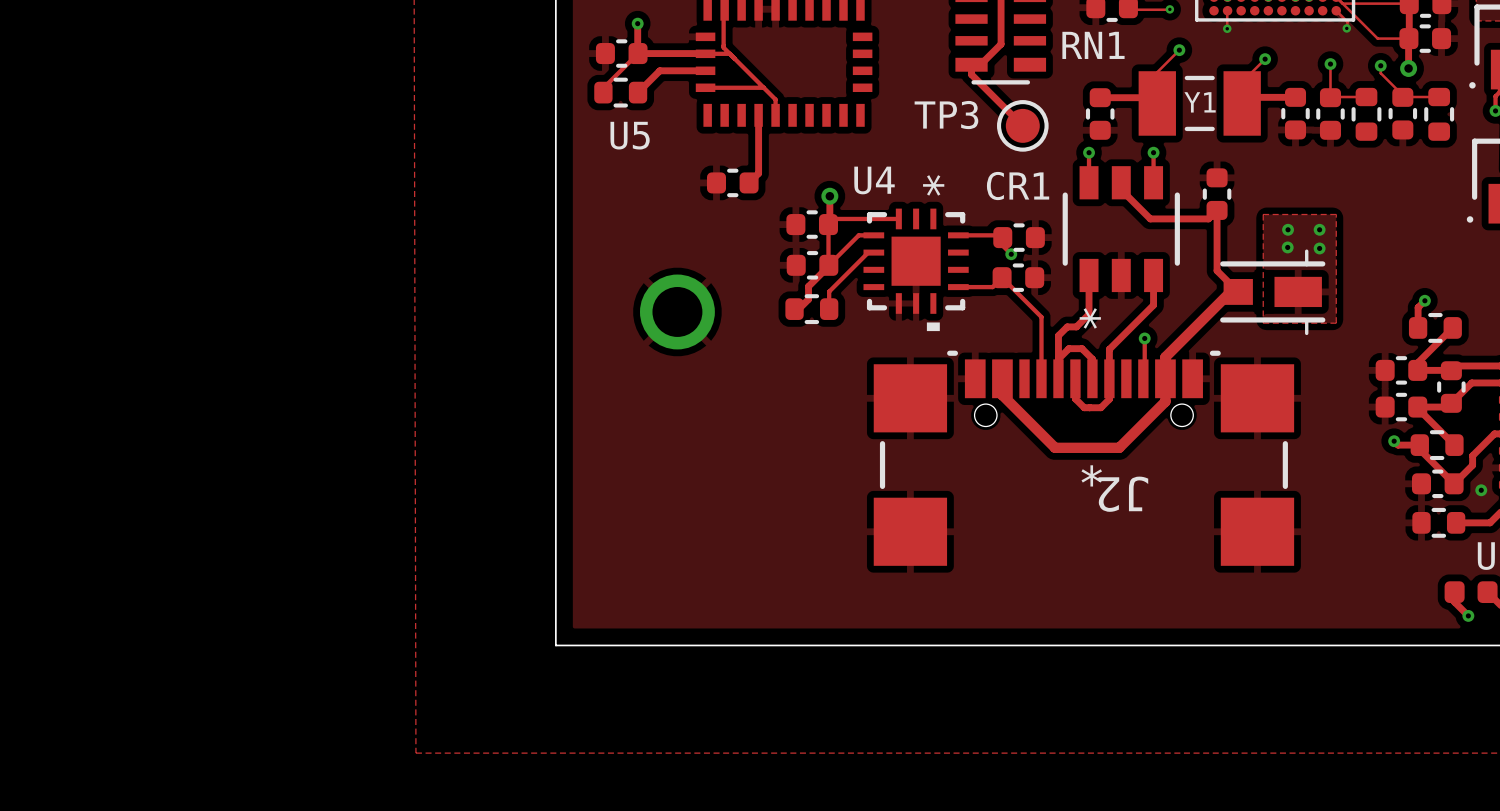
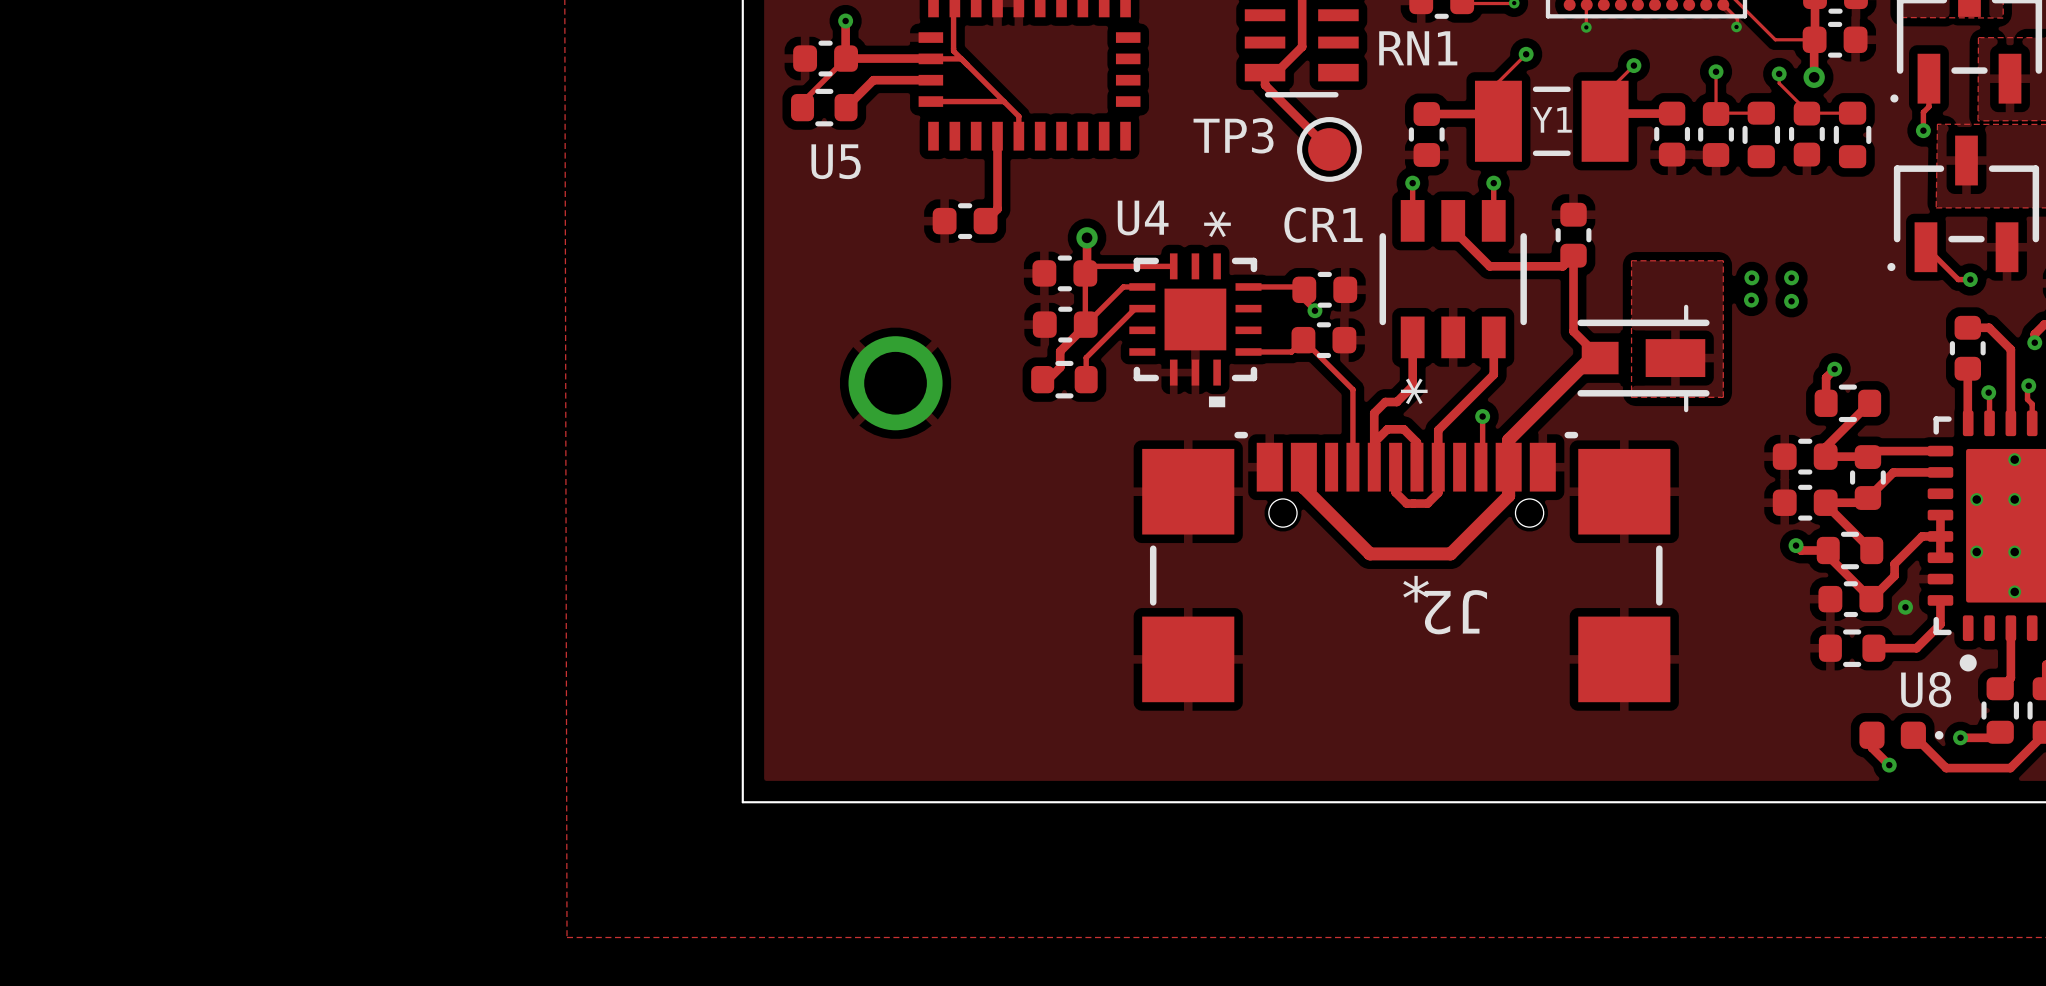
via: none -> (1751, 277)
via: none -> (1791, 277)
via: (1288, 229) -> none
via: (1319, 229) -> none
via: none -> (1751, 300)
via: none -> (1791, 301)
via: (1287, 247) -> none
via: (1319, 248) -> none

